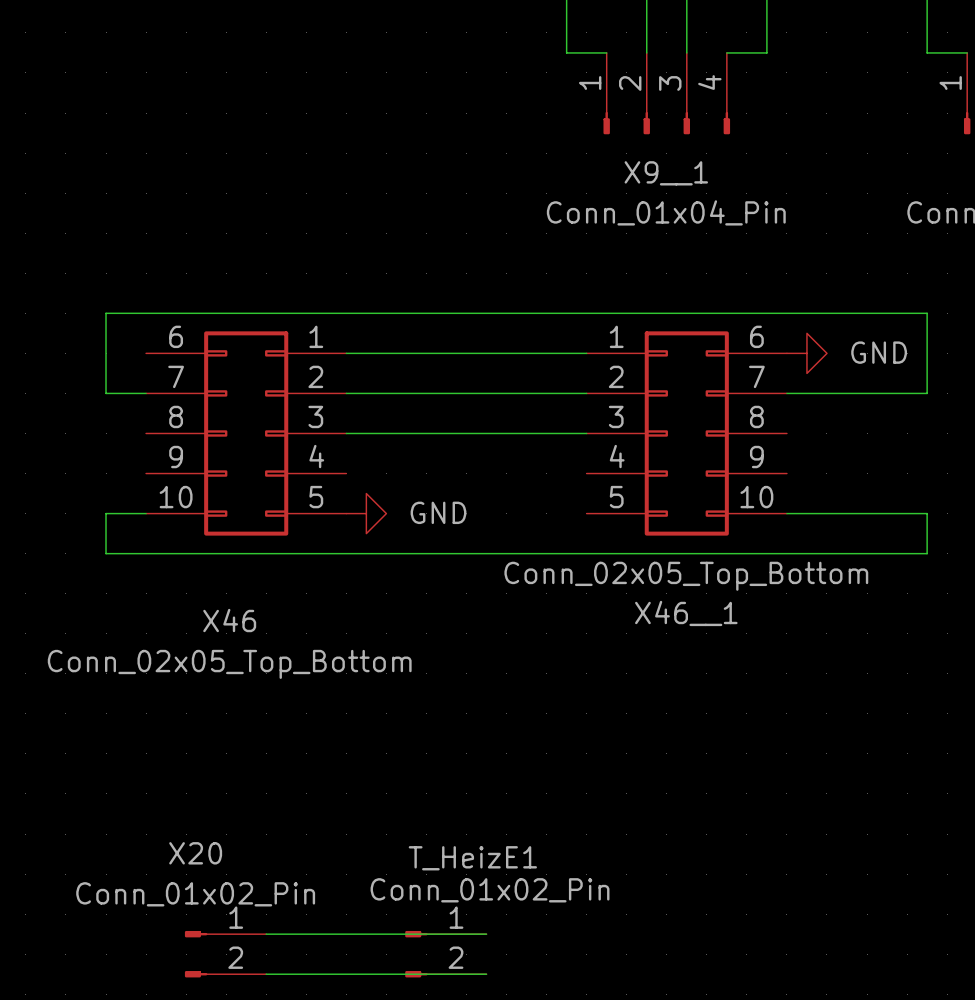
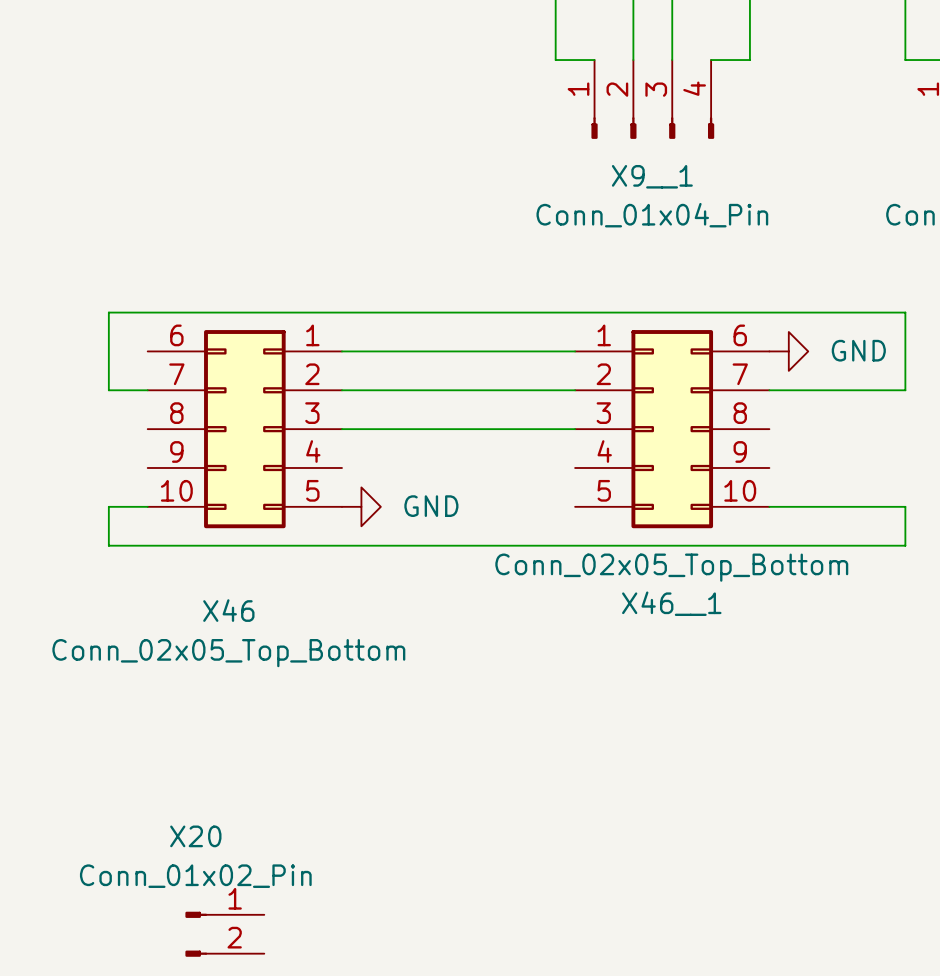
wire: (266, 934) (486, 934) -> none
T_HeizE1: Conn_01x02_Pin (445, 954) -> none
wire: (266, 974) (486, 974) -> none

